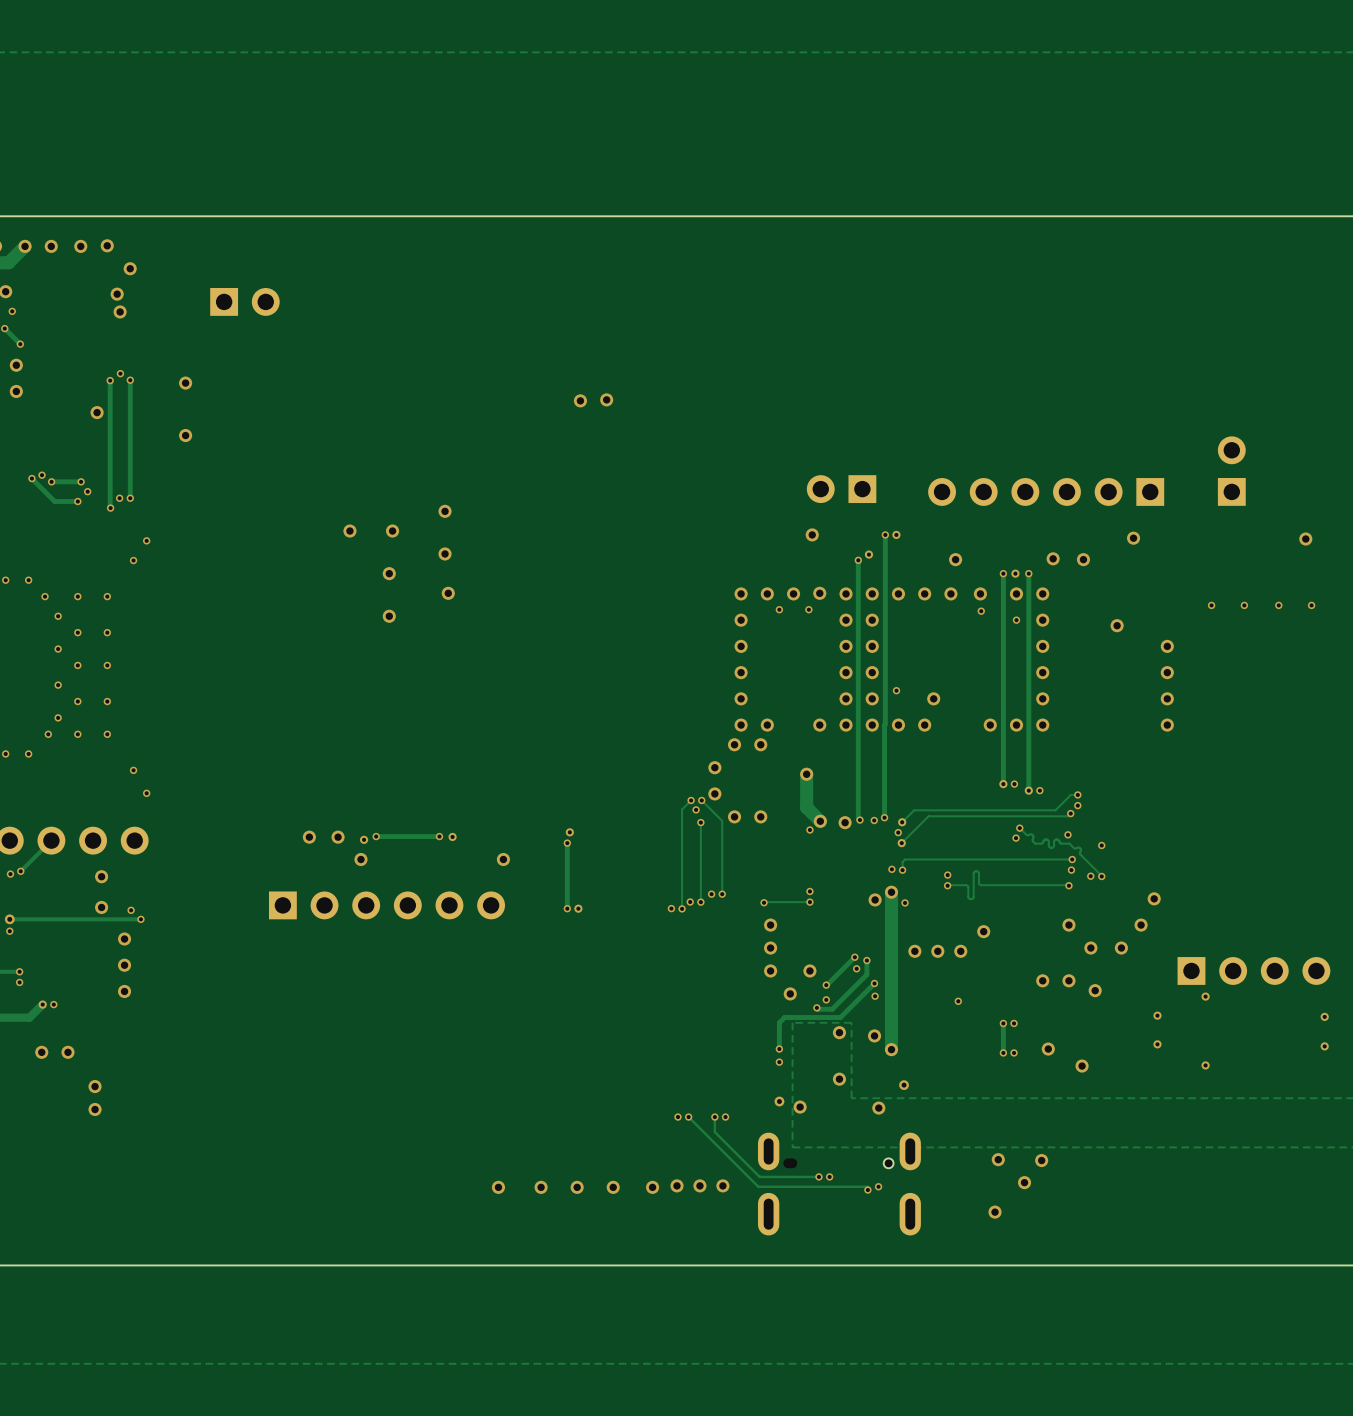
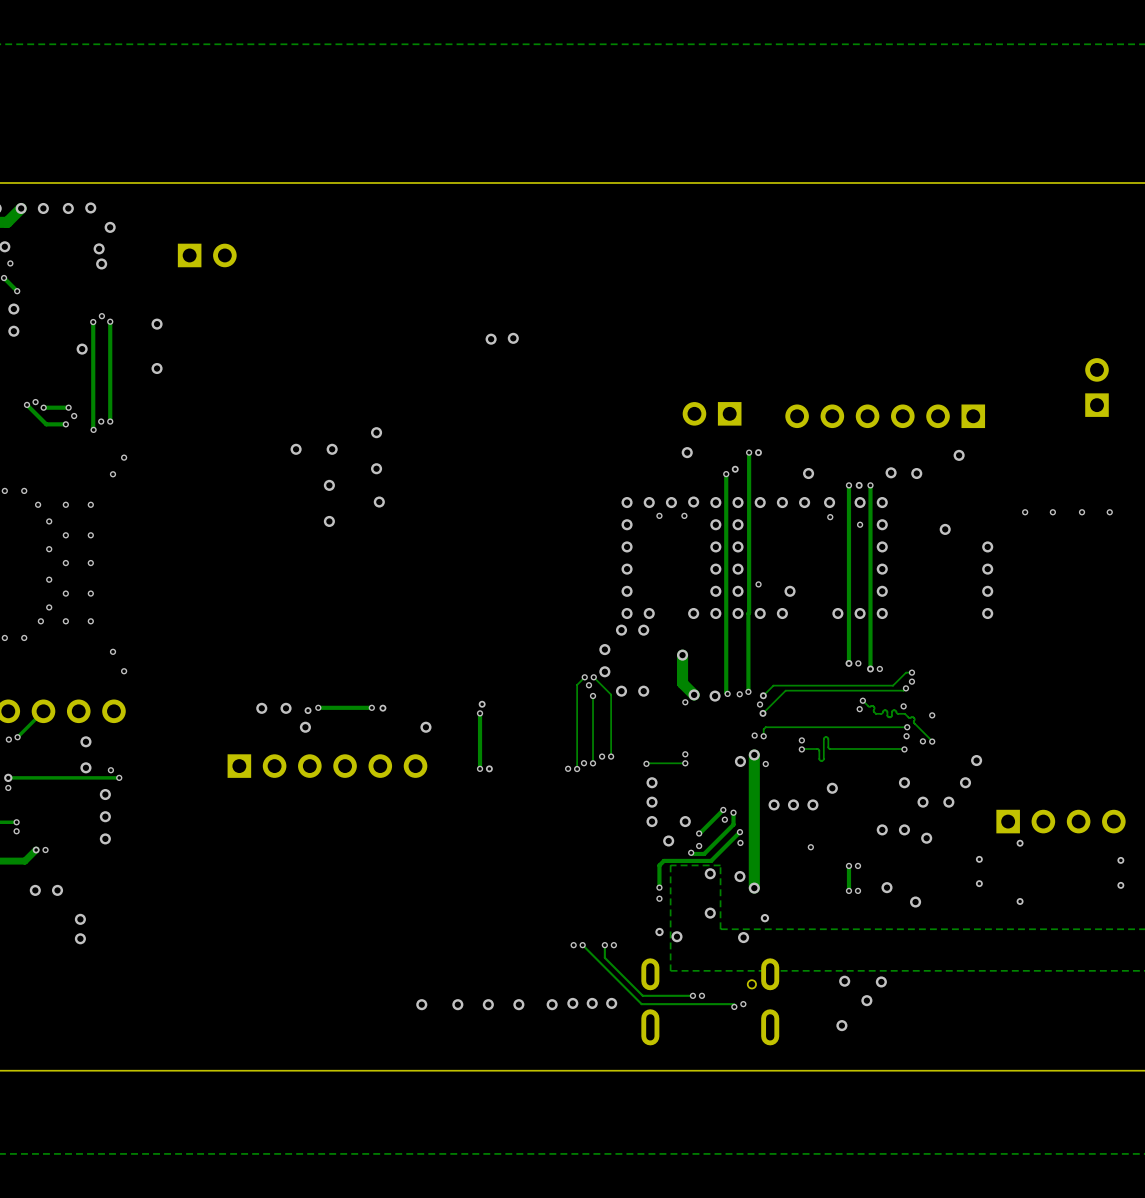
part position: (1231, 471) -> (1096, 387)
via: (1305, 539) -> none

